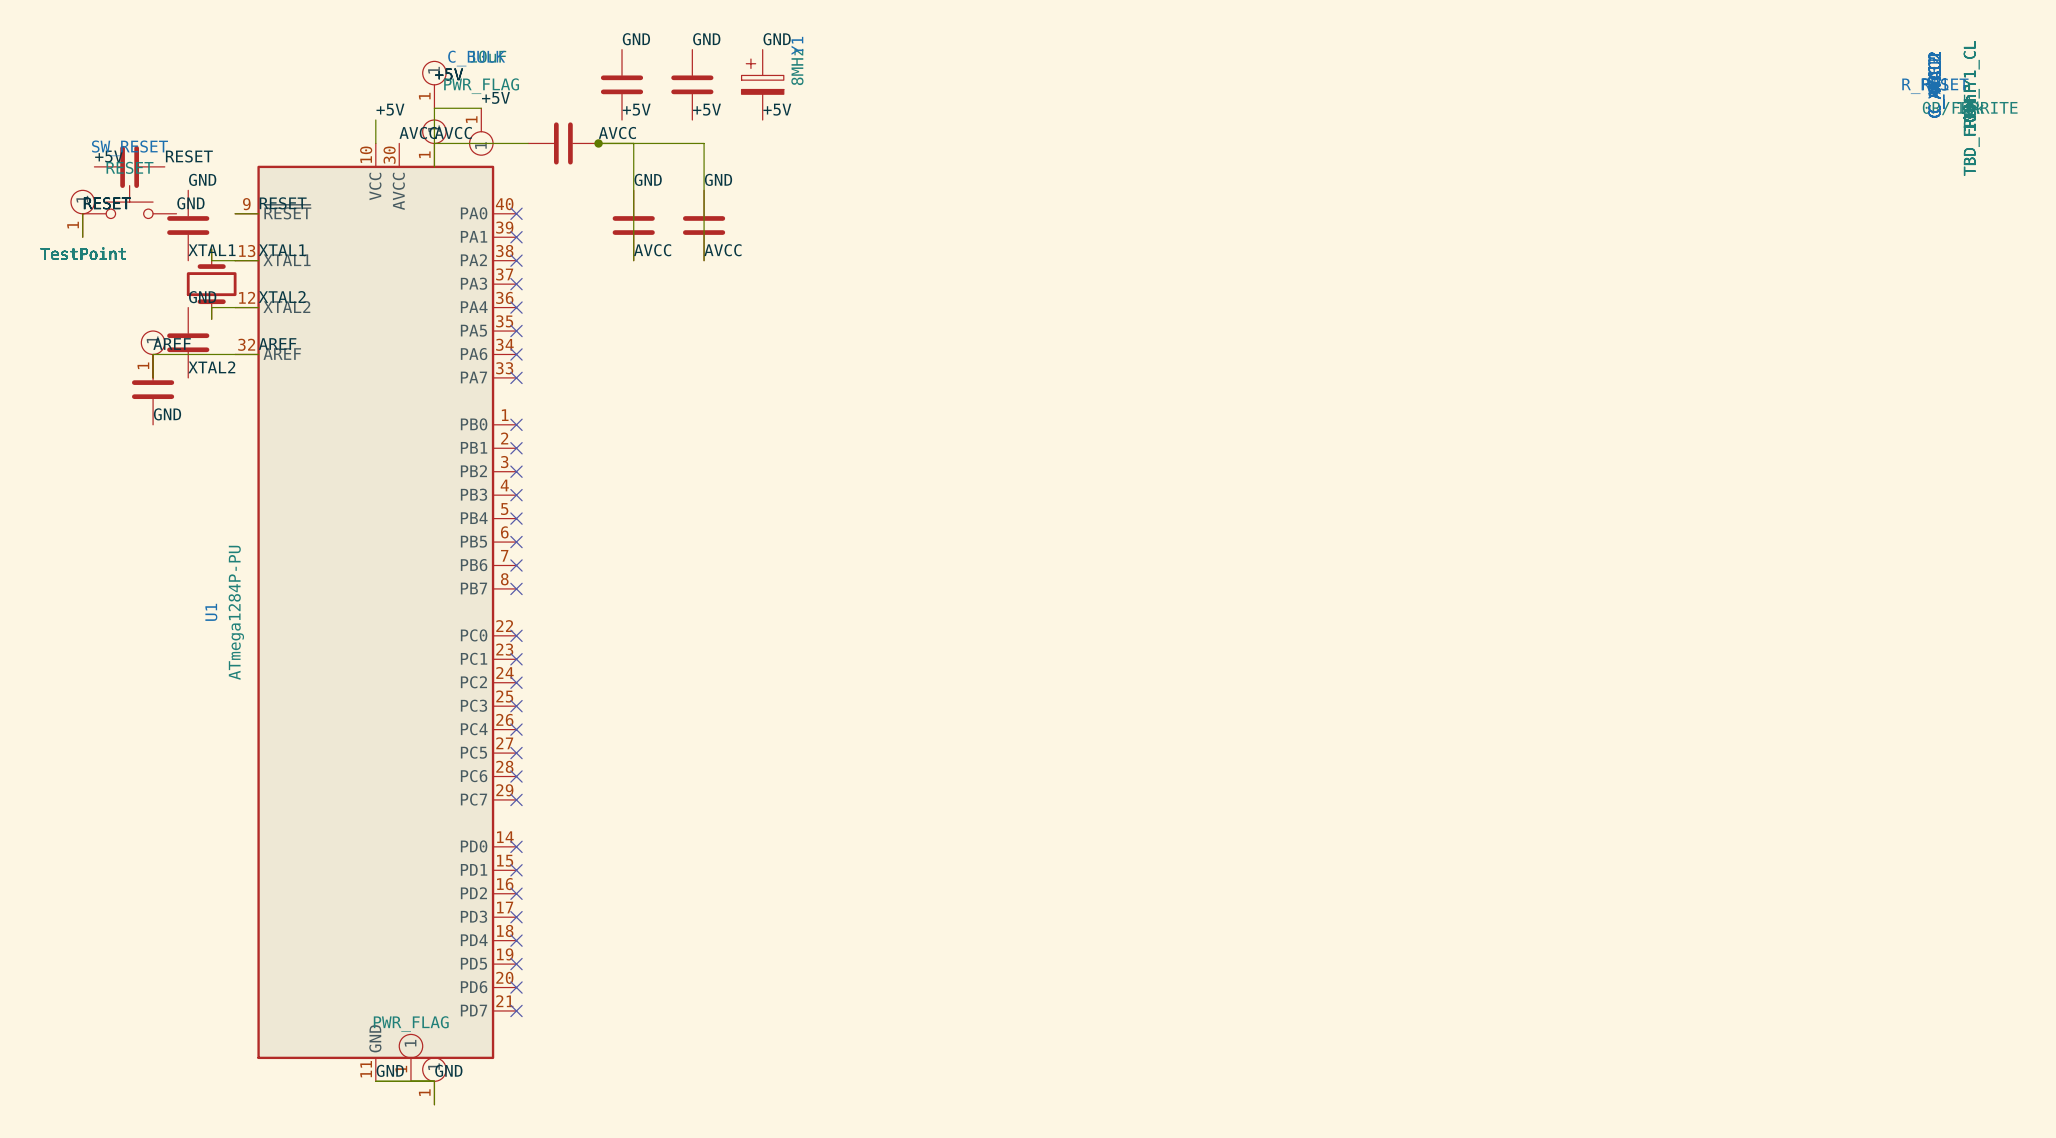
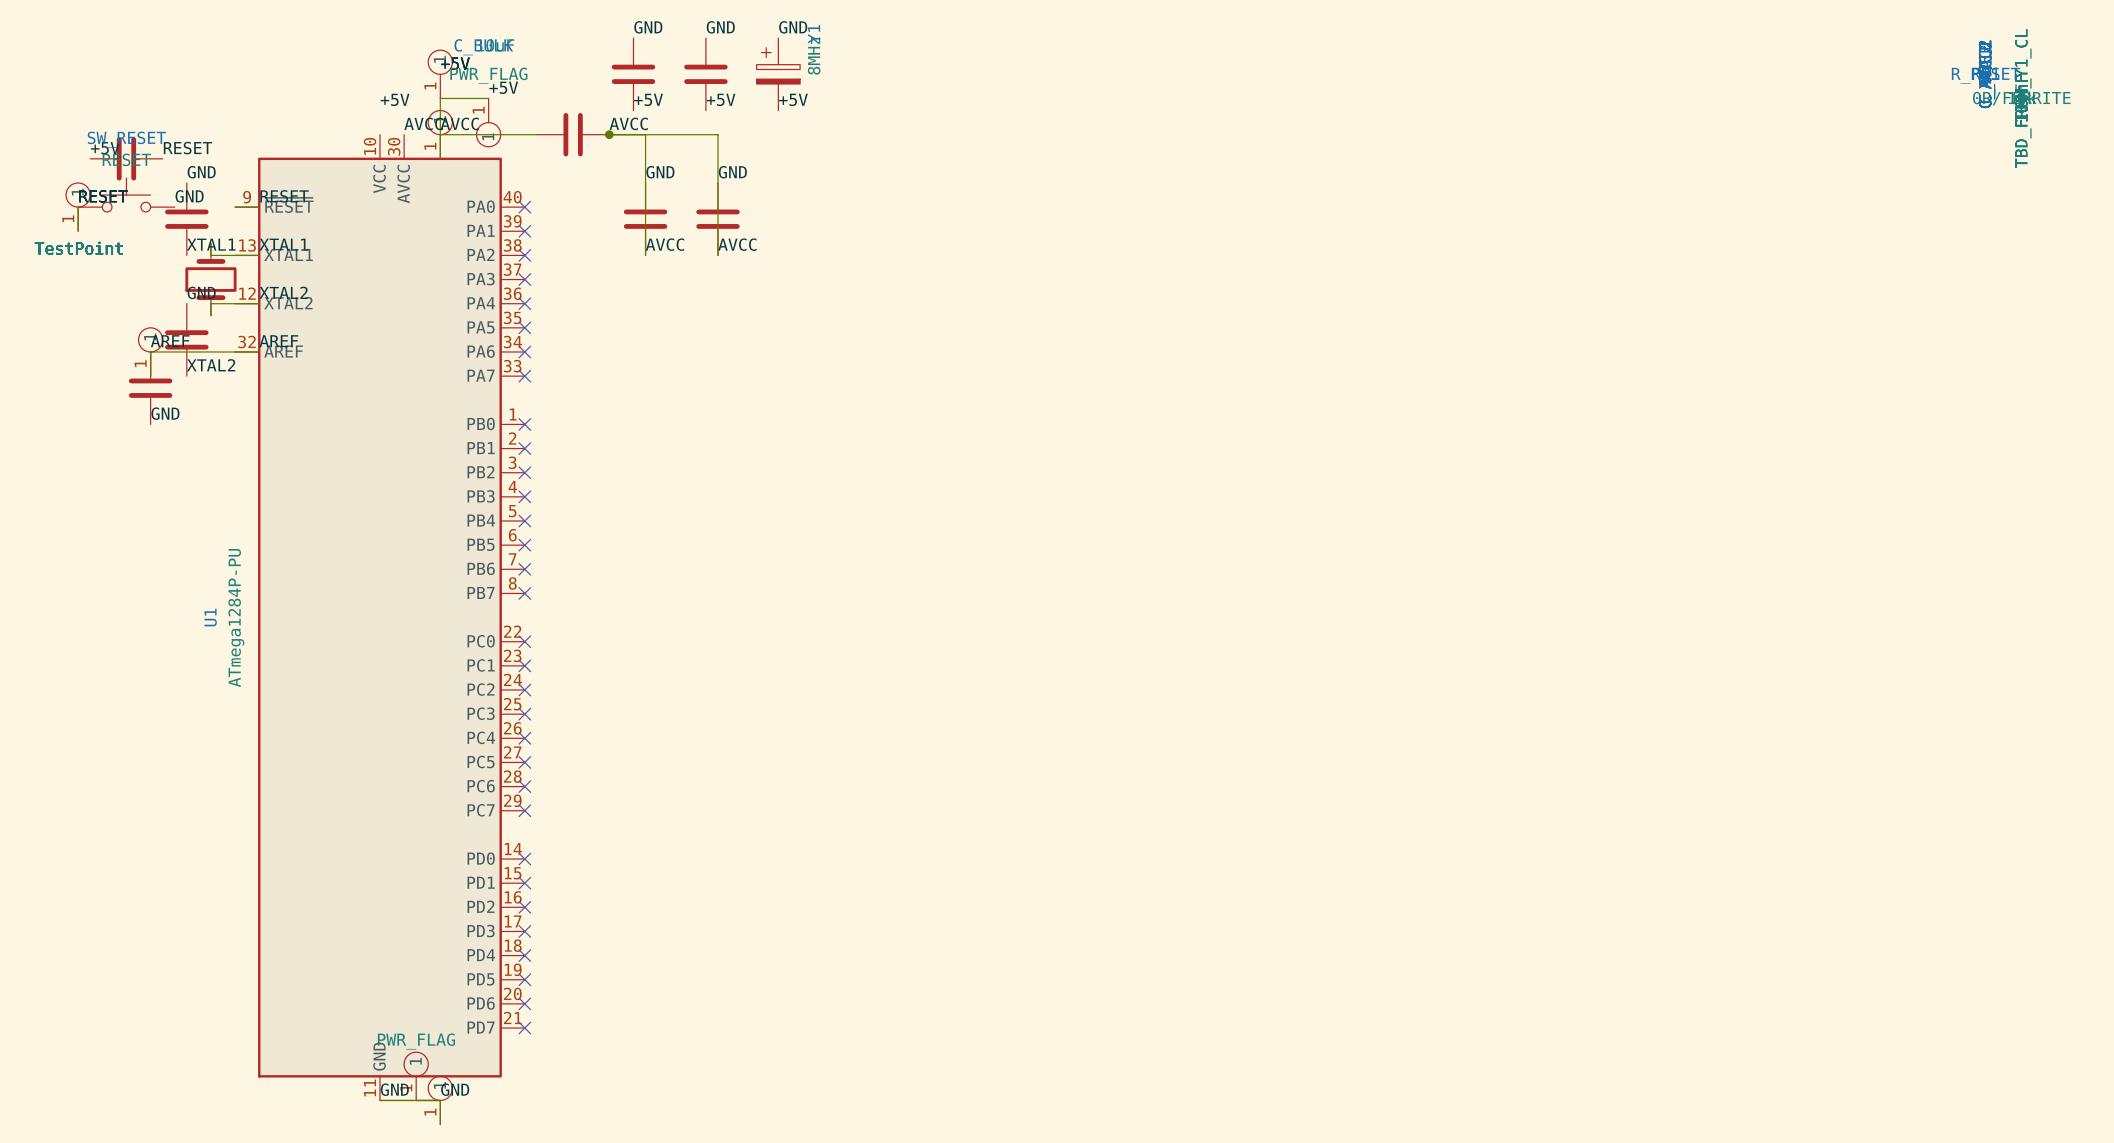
wire: (375, 120) (375, 143) -> none

